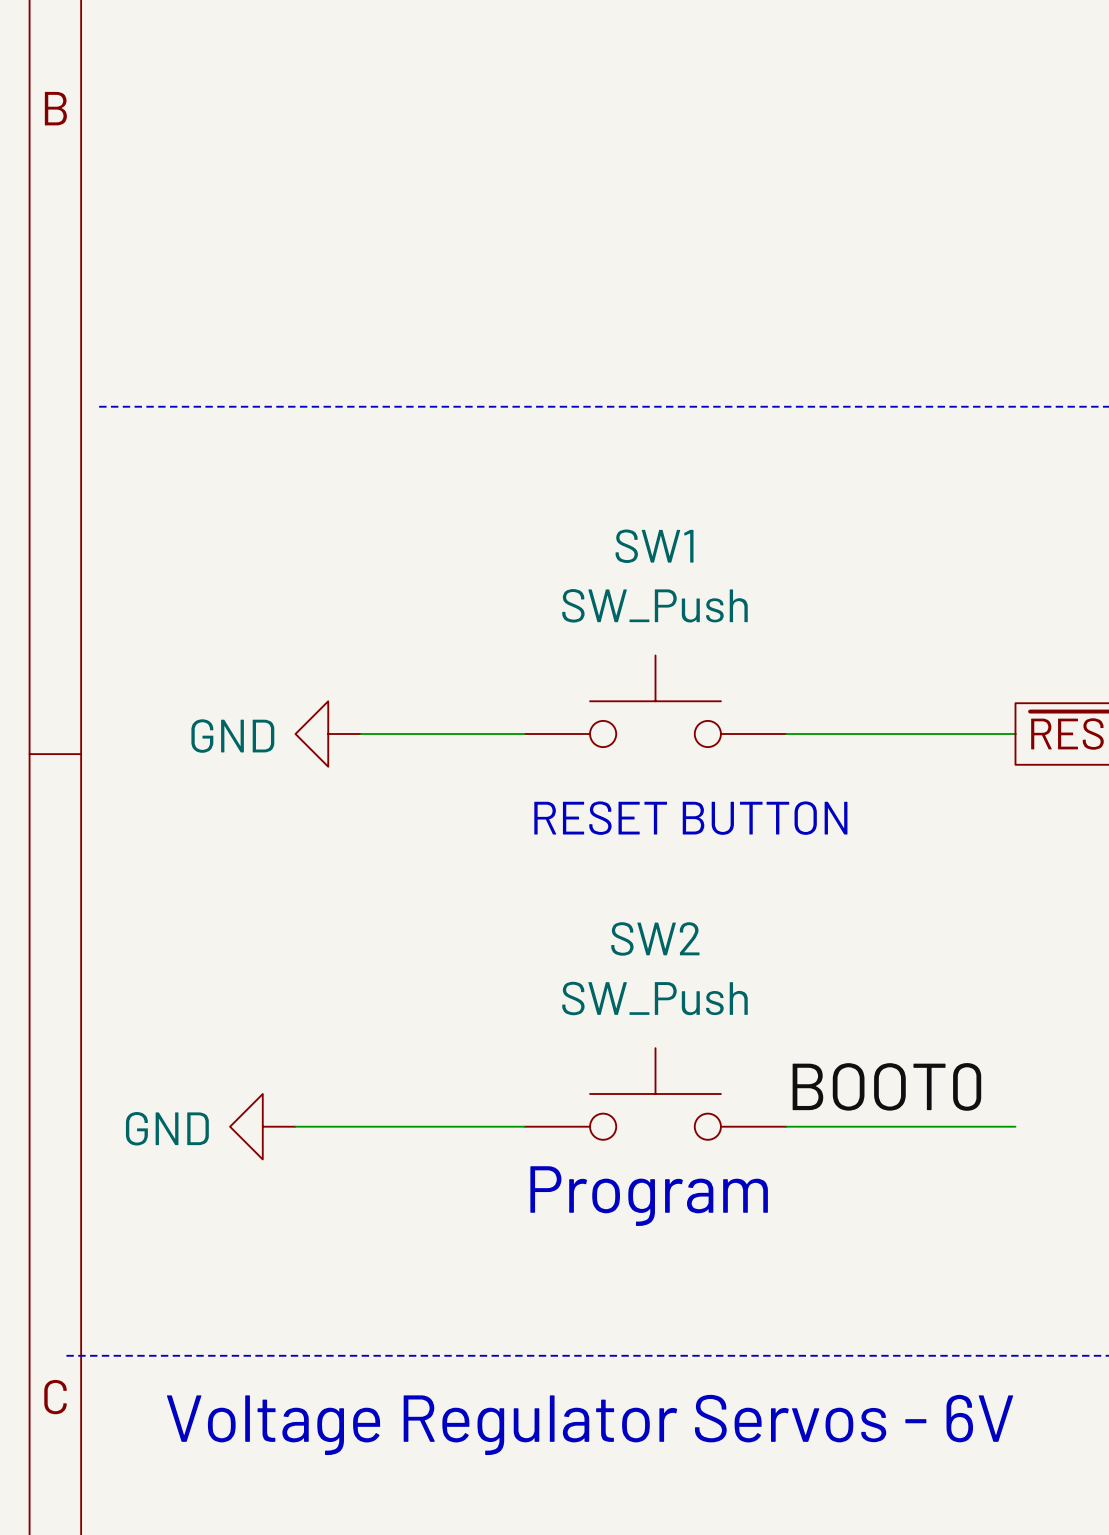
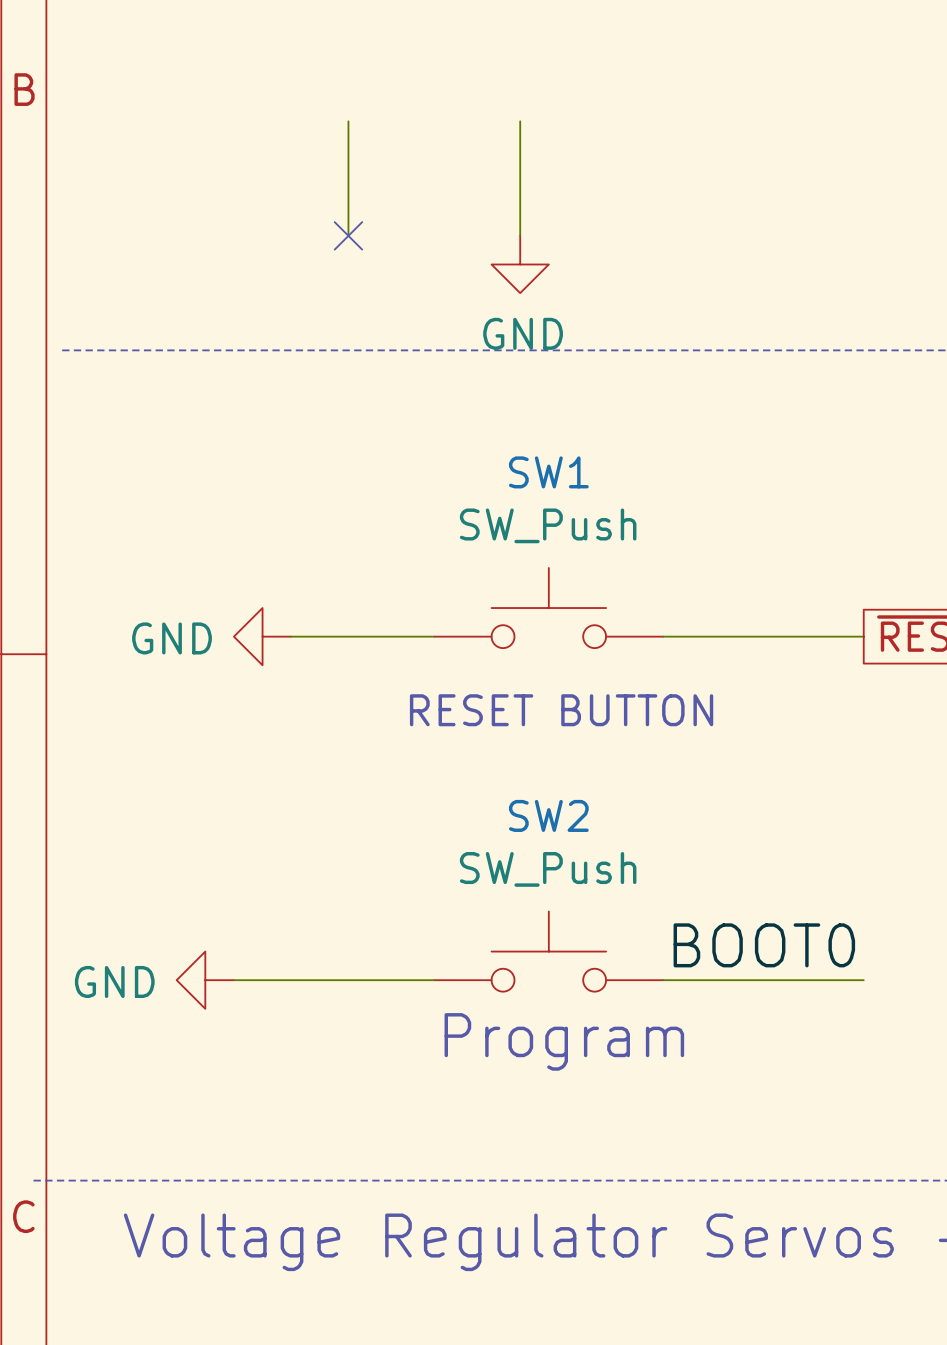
wire: none -> (348, 121) (348, 235)
wire: none -> (520, 121) (520, 235)
no-connect mark: none -> (348, 235)
power symbol: none -> GND (520, 264)

